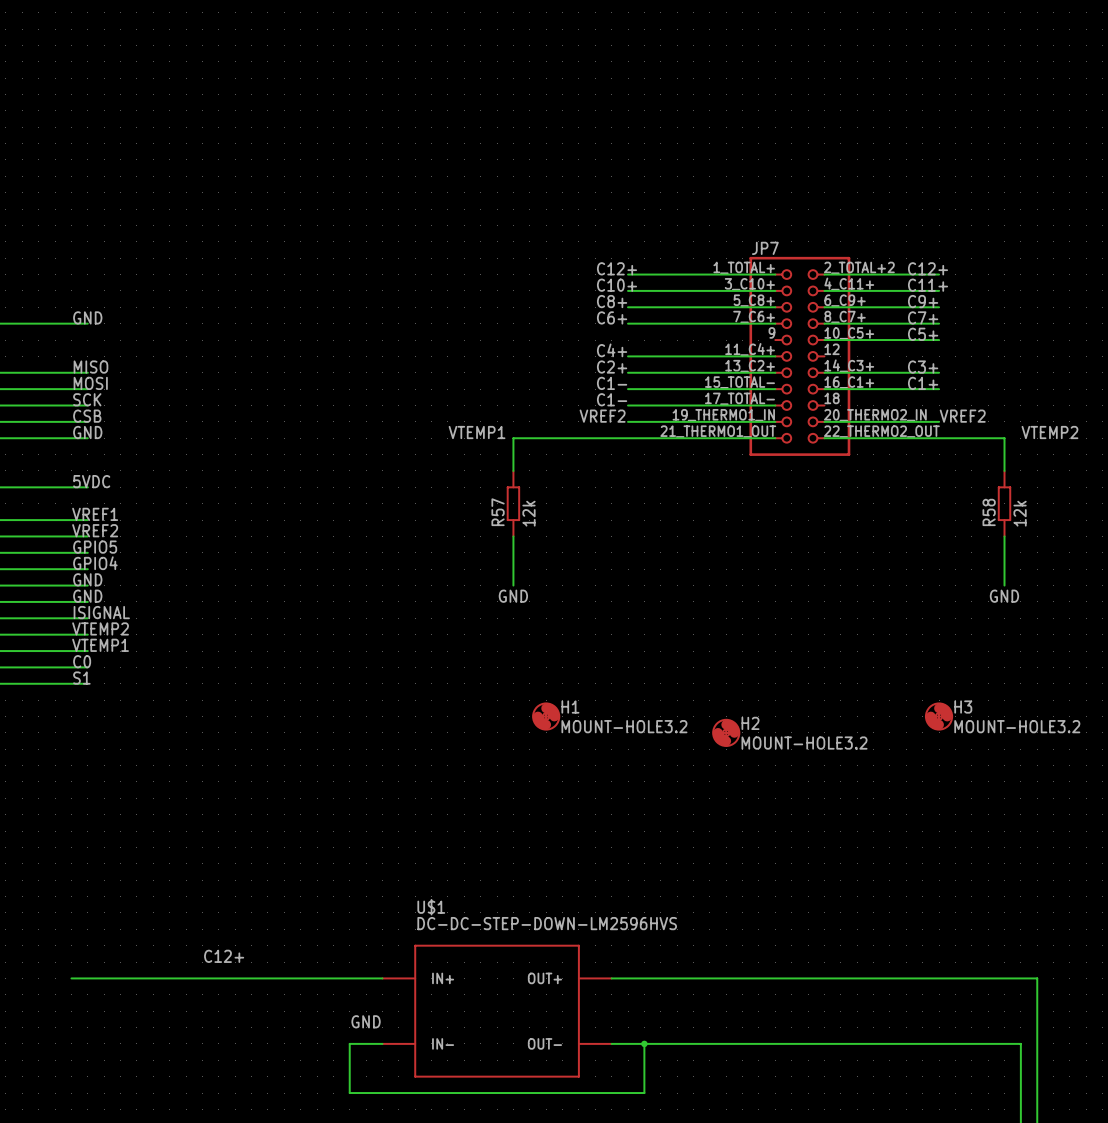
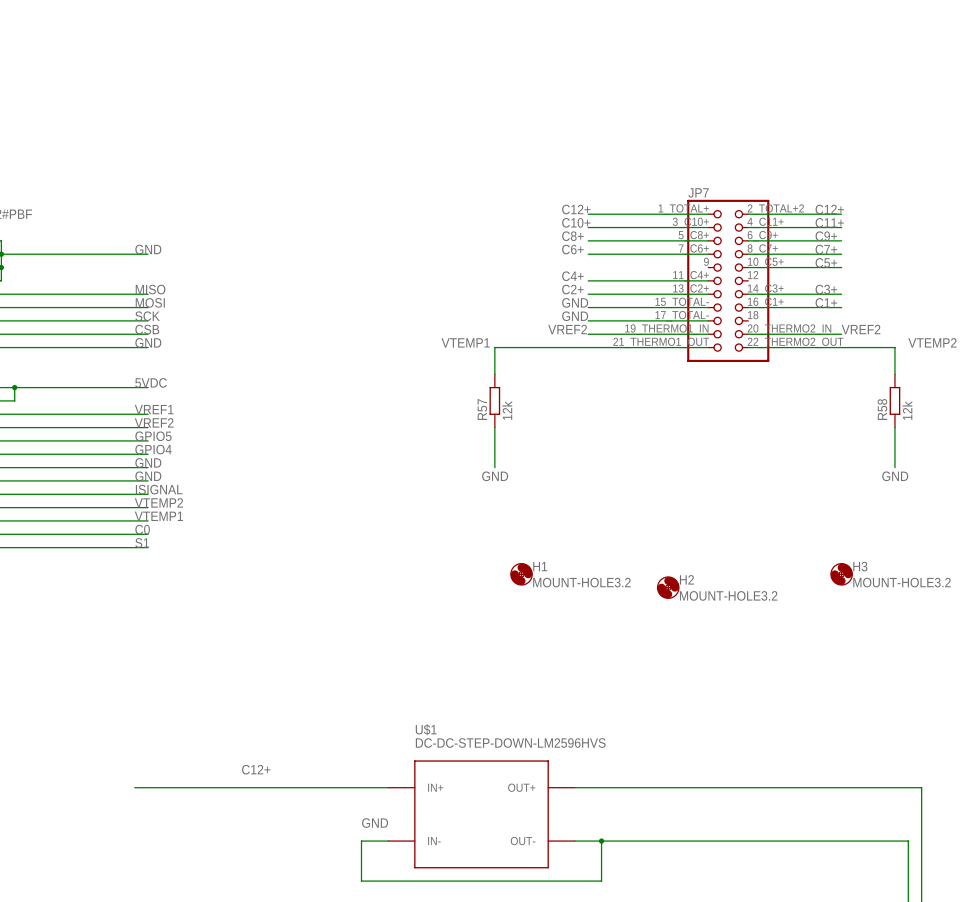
label: C1- (612, 383) -> GND (575, 302)
label: C1- (612, 399) -> GND (575, 316)

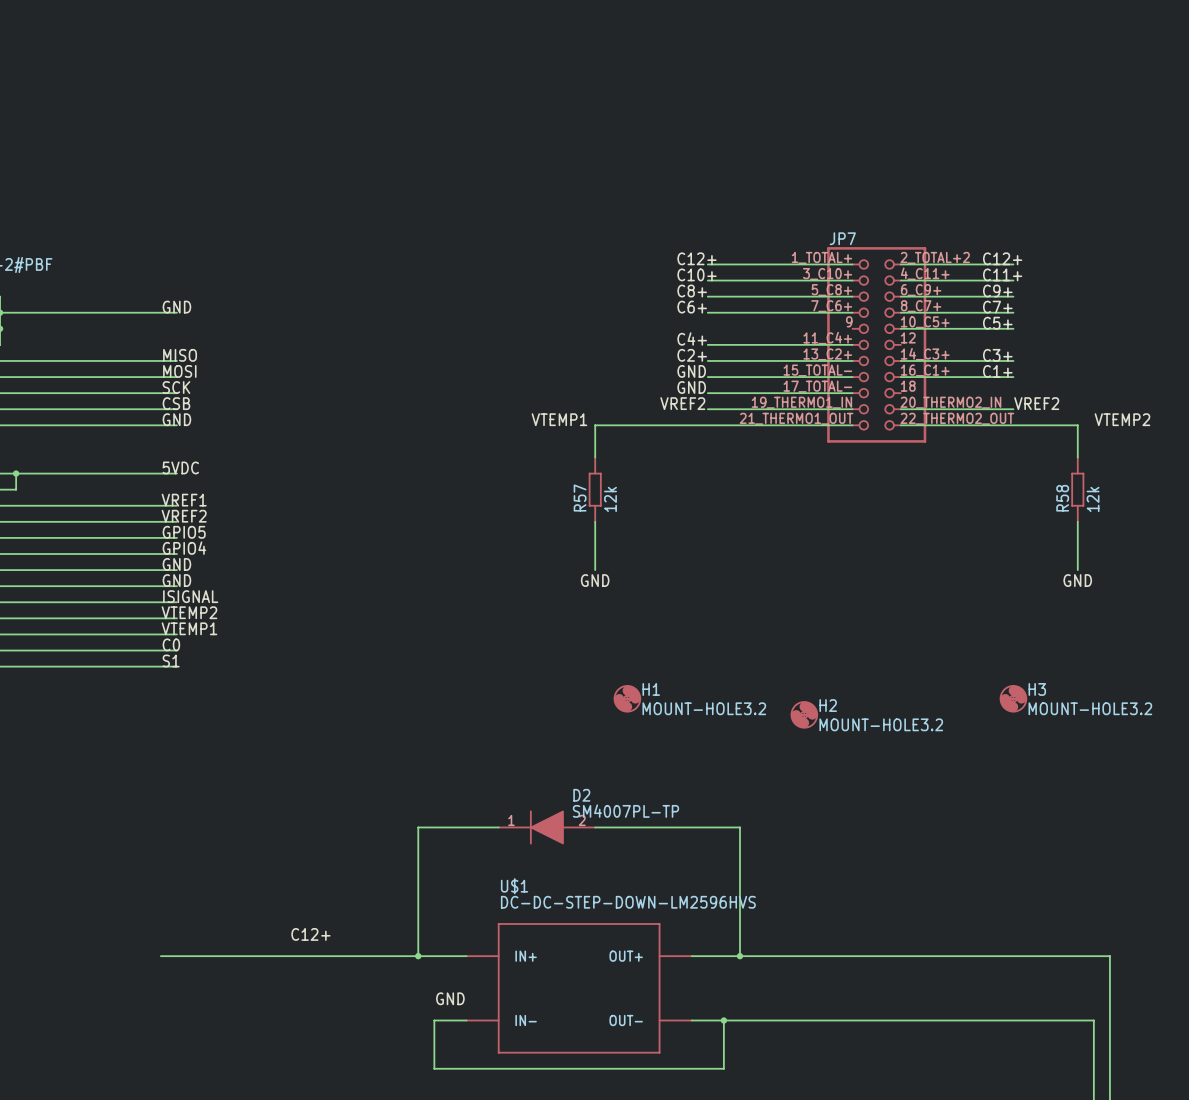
wire: none -> (498, 827) (418, 827) (418, 956)
D2: none -> SM4007PL-TP (546, 827)
wire: none -> (595, 827) (739, 827) (739, 956)
junction: none -> (418, 956)
junction: none -> (739, 956)

